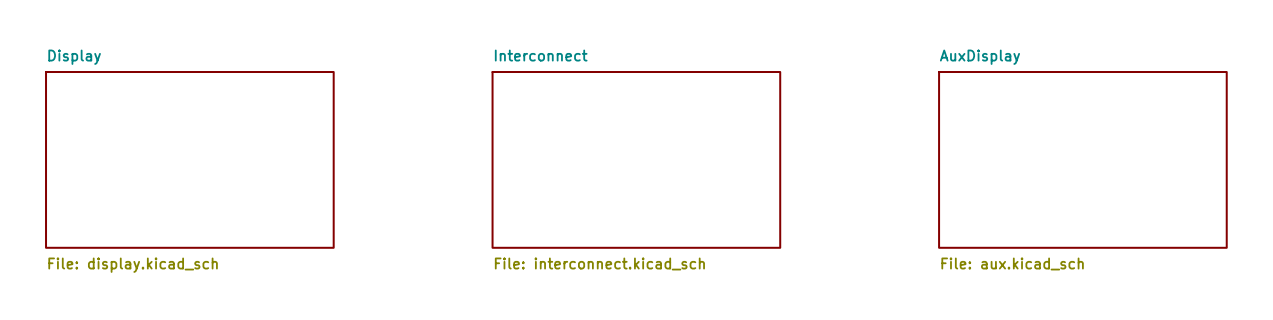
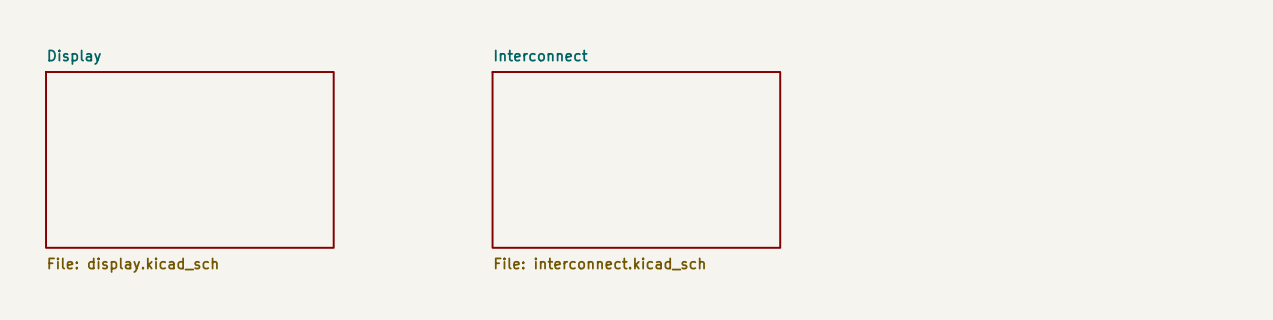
sheet AuxDisplay: File: aux.kicad_sch (1082, 159) -> none

